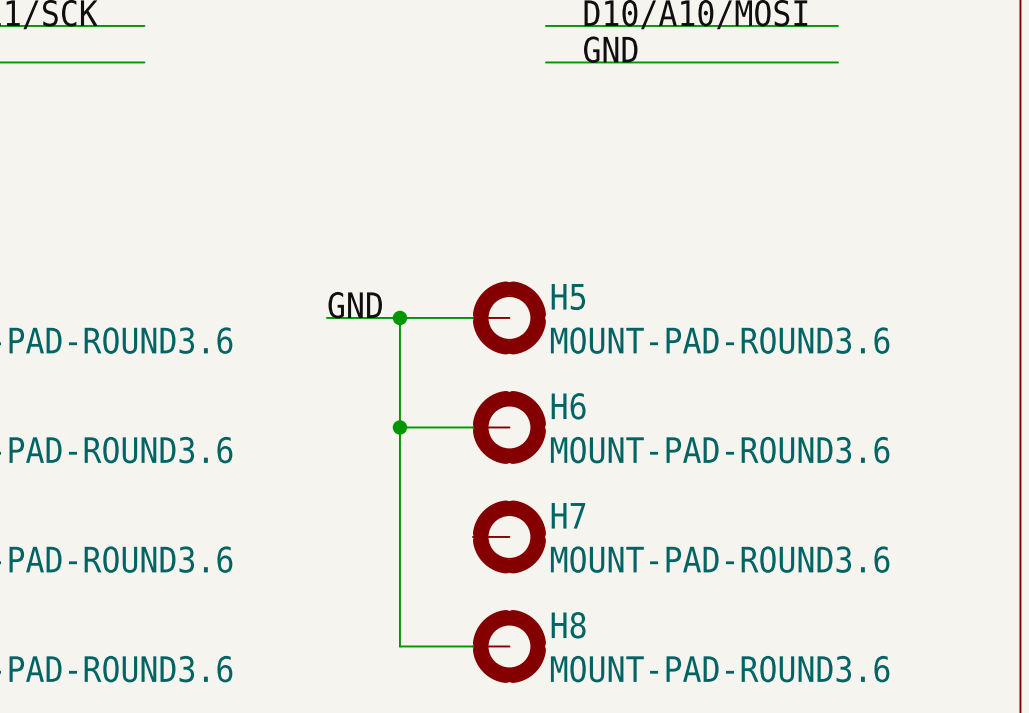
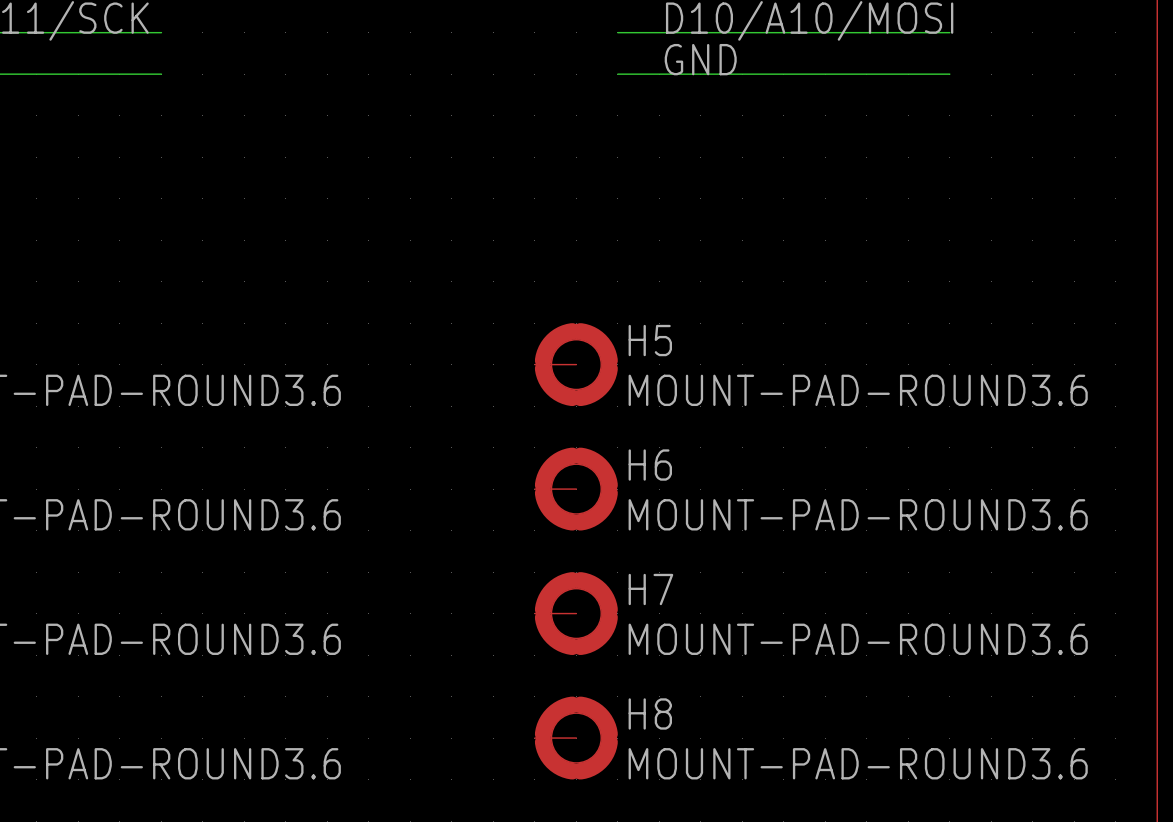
label: GND (355, 305) -> none
wire: (326, 317) (472, 317) -> none
wire: (399, 317) (399, 646) (472, 646) -> none
junction: (399, 317) -> none
wire: (399, 427) (472, 427) -> none
junction: (399, 427) -> none

